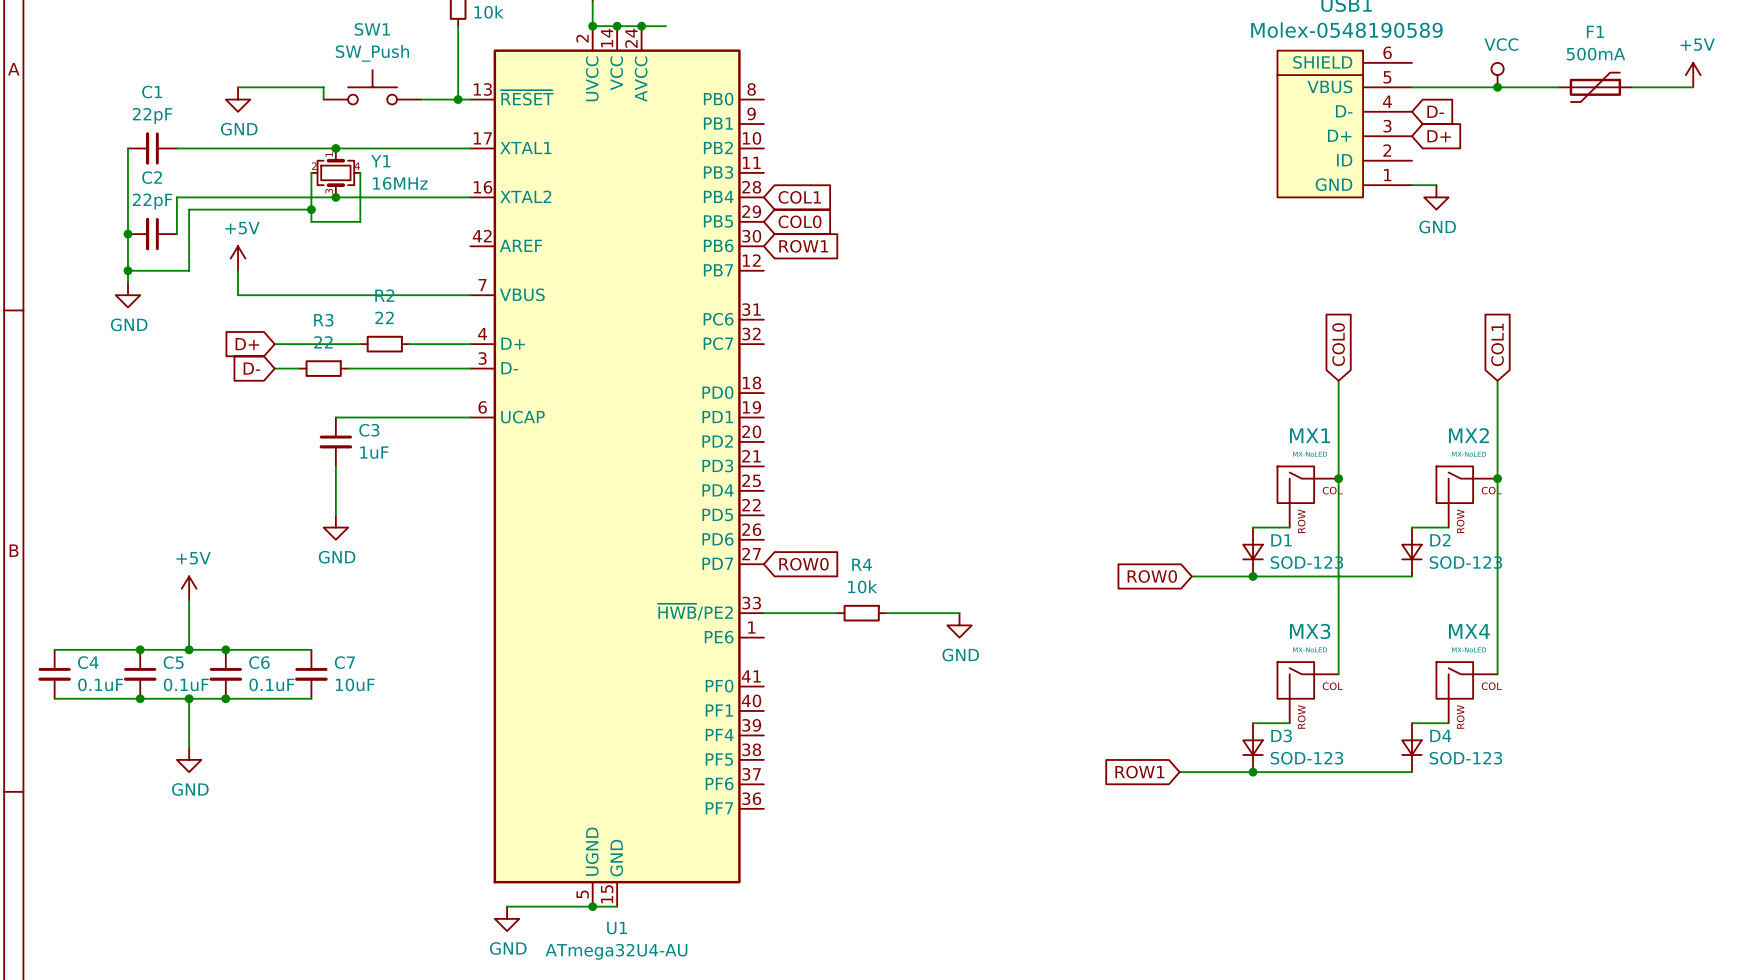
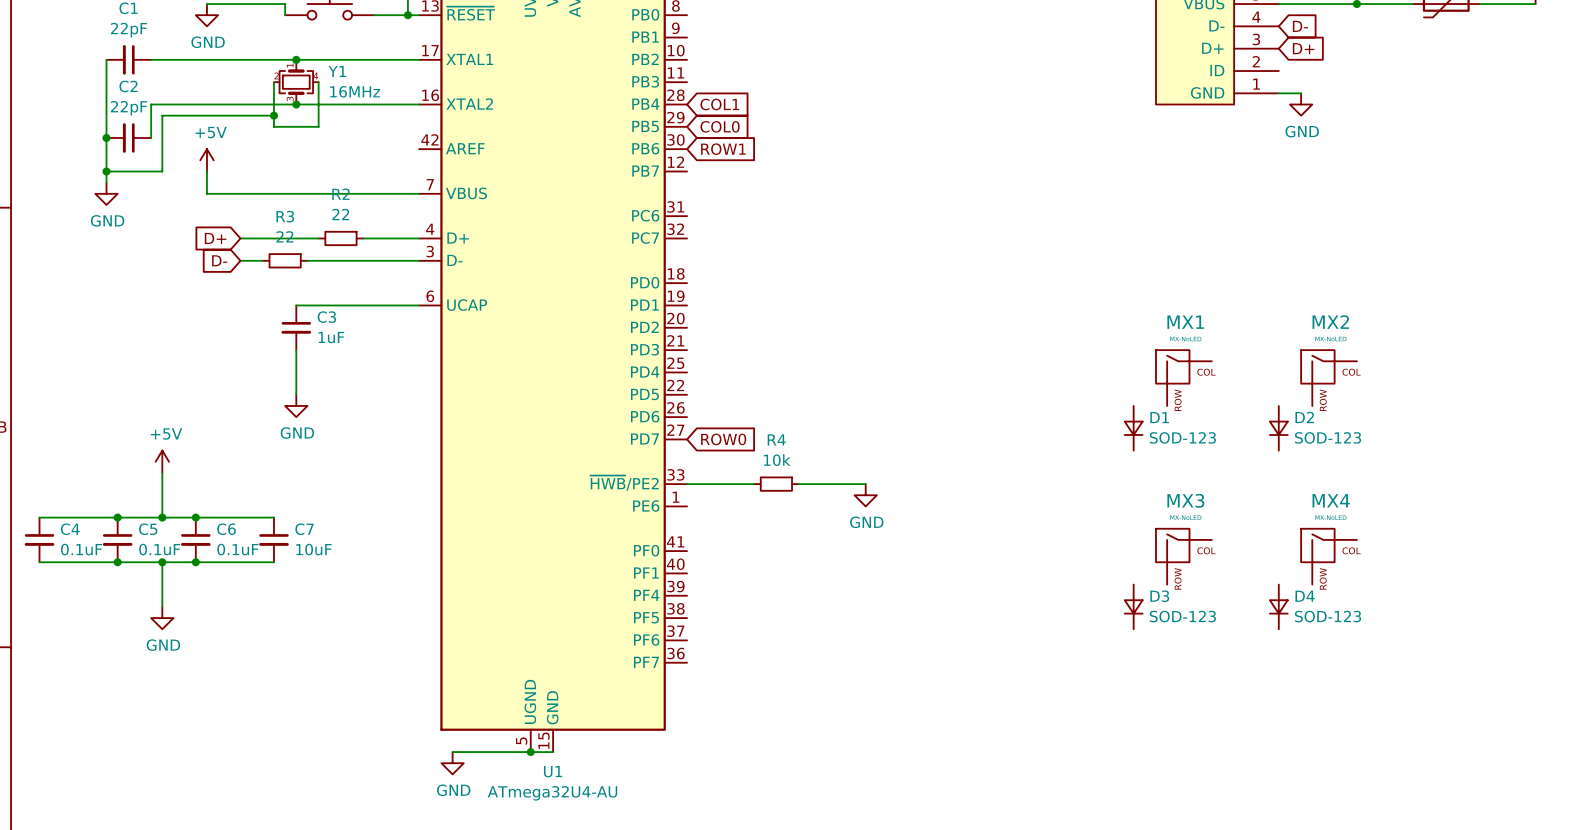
global label: COL0 (1338, 344) -> none
global label: COL1 (1497, 344) -> none
wire: (1338, 380) (1338, 674) -> none
wire: (1497, 380) (1497, 674) -> none
junction: (1338, 478) -> none
junction: (1497, 478) -> none
wire: (1253, 527) (1289, 527) -> none
wire: (1411, 527) (1448, 527) -> none
global label: ROW0 (1152, 576) -> none
wire: (1191, 576) (1411, 576) -> none
junction: (1253, 576) -> none
wire: (1253, 723) (1289, 723) -> none
wire: (1411, 723) (1448, 723) -> none
global label: ROW1 (1139, 772) -> none
wire: (1179, 772) (1411, 772) -> none
junction: (1253, 772) -> none

